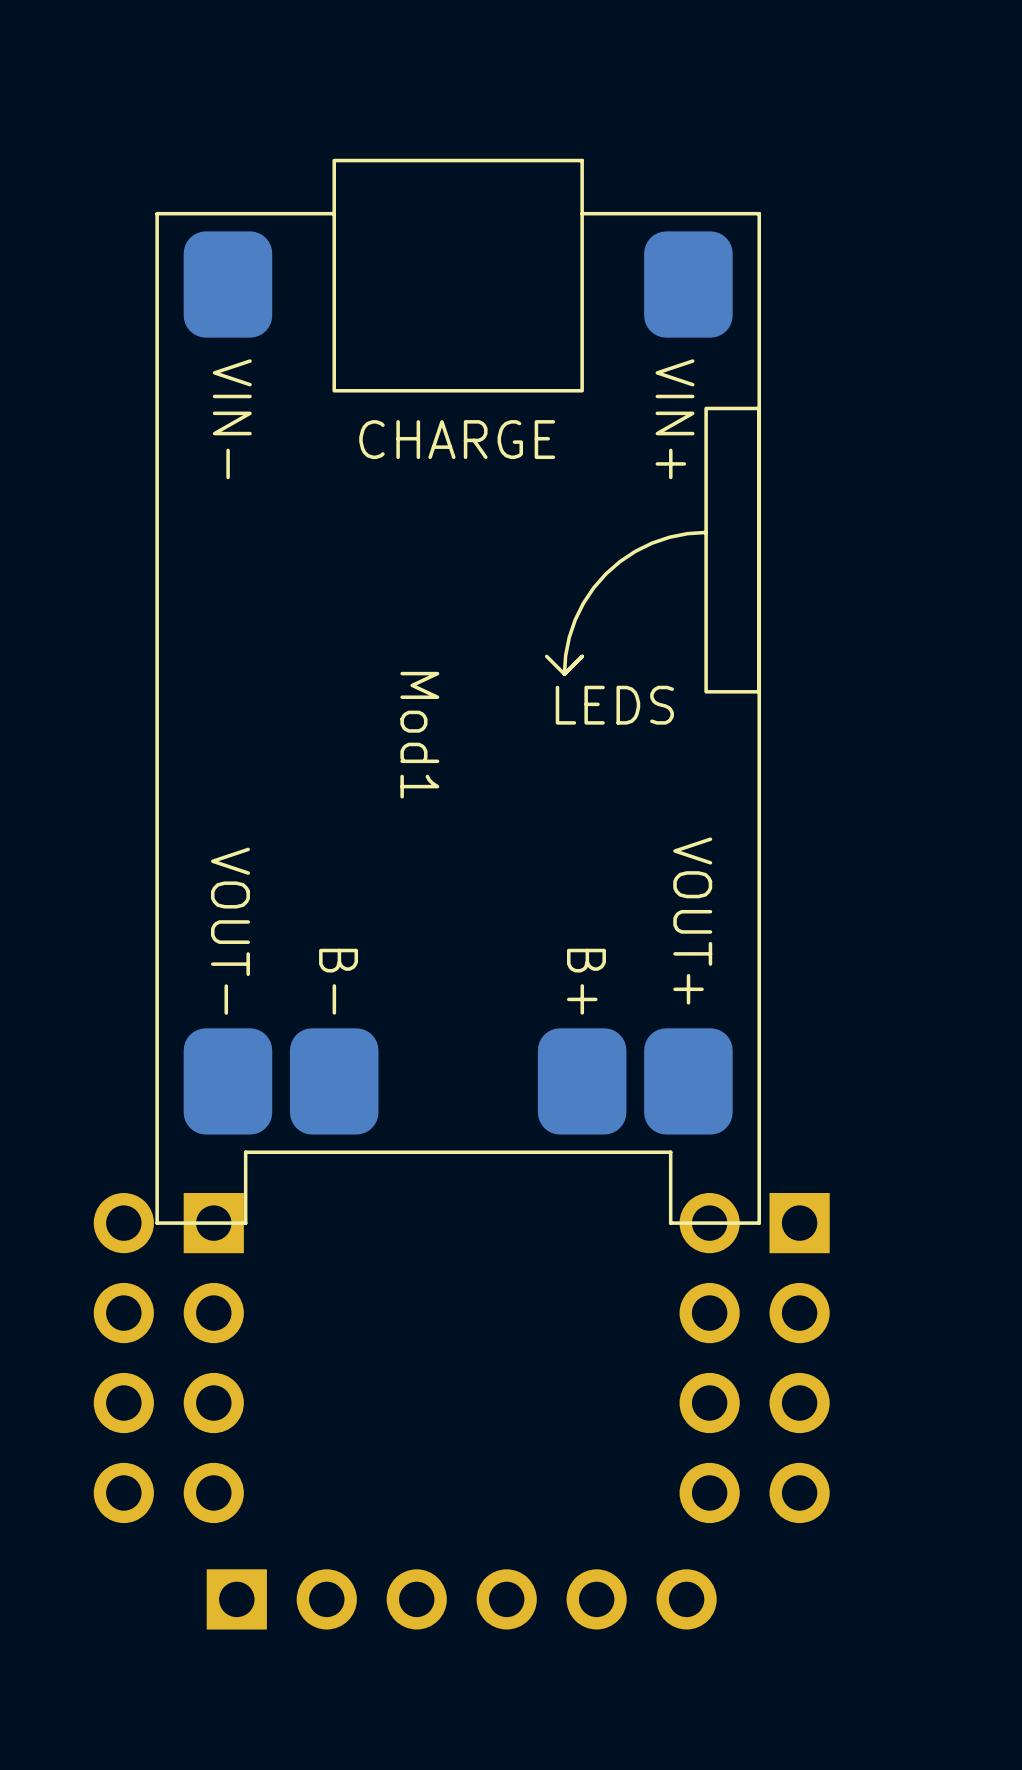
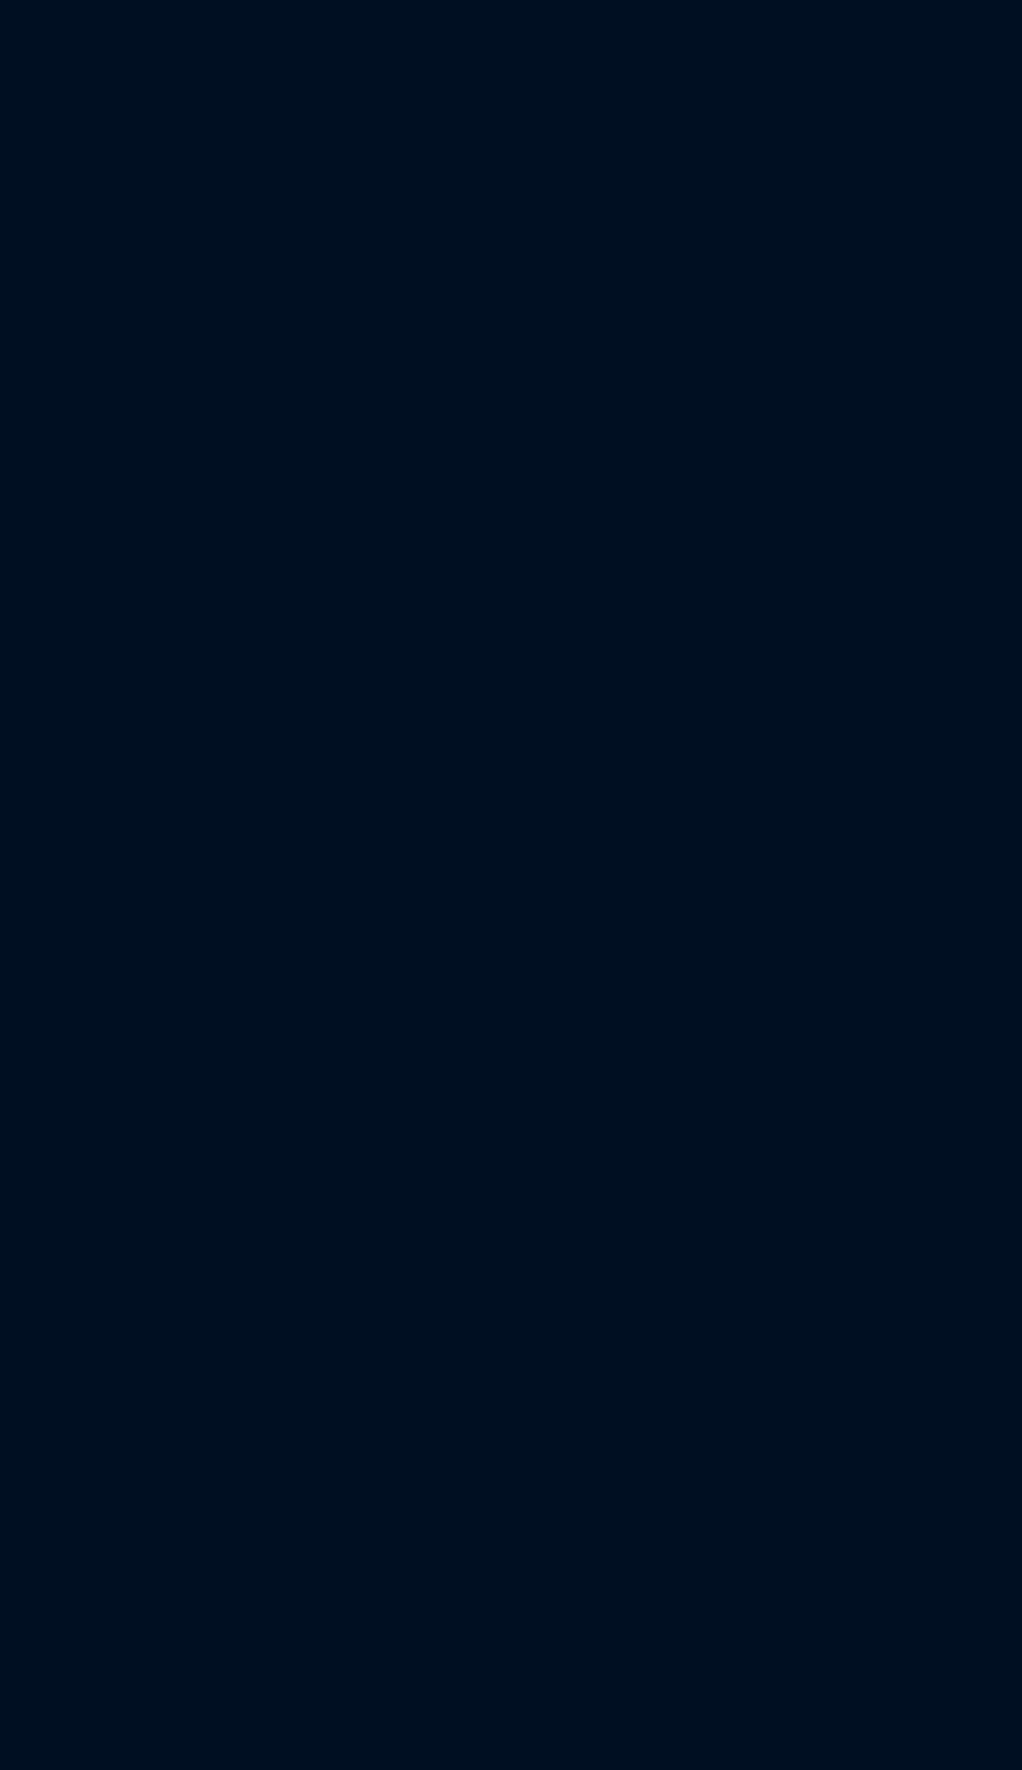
Mod1: (458, 691) -> none
part: (168, 1358) -> none
part: (754, 1358) -> none
part: (461, 1599) -> none

